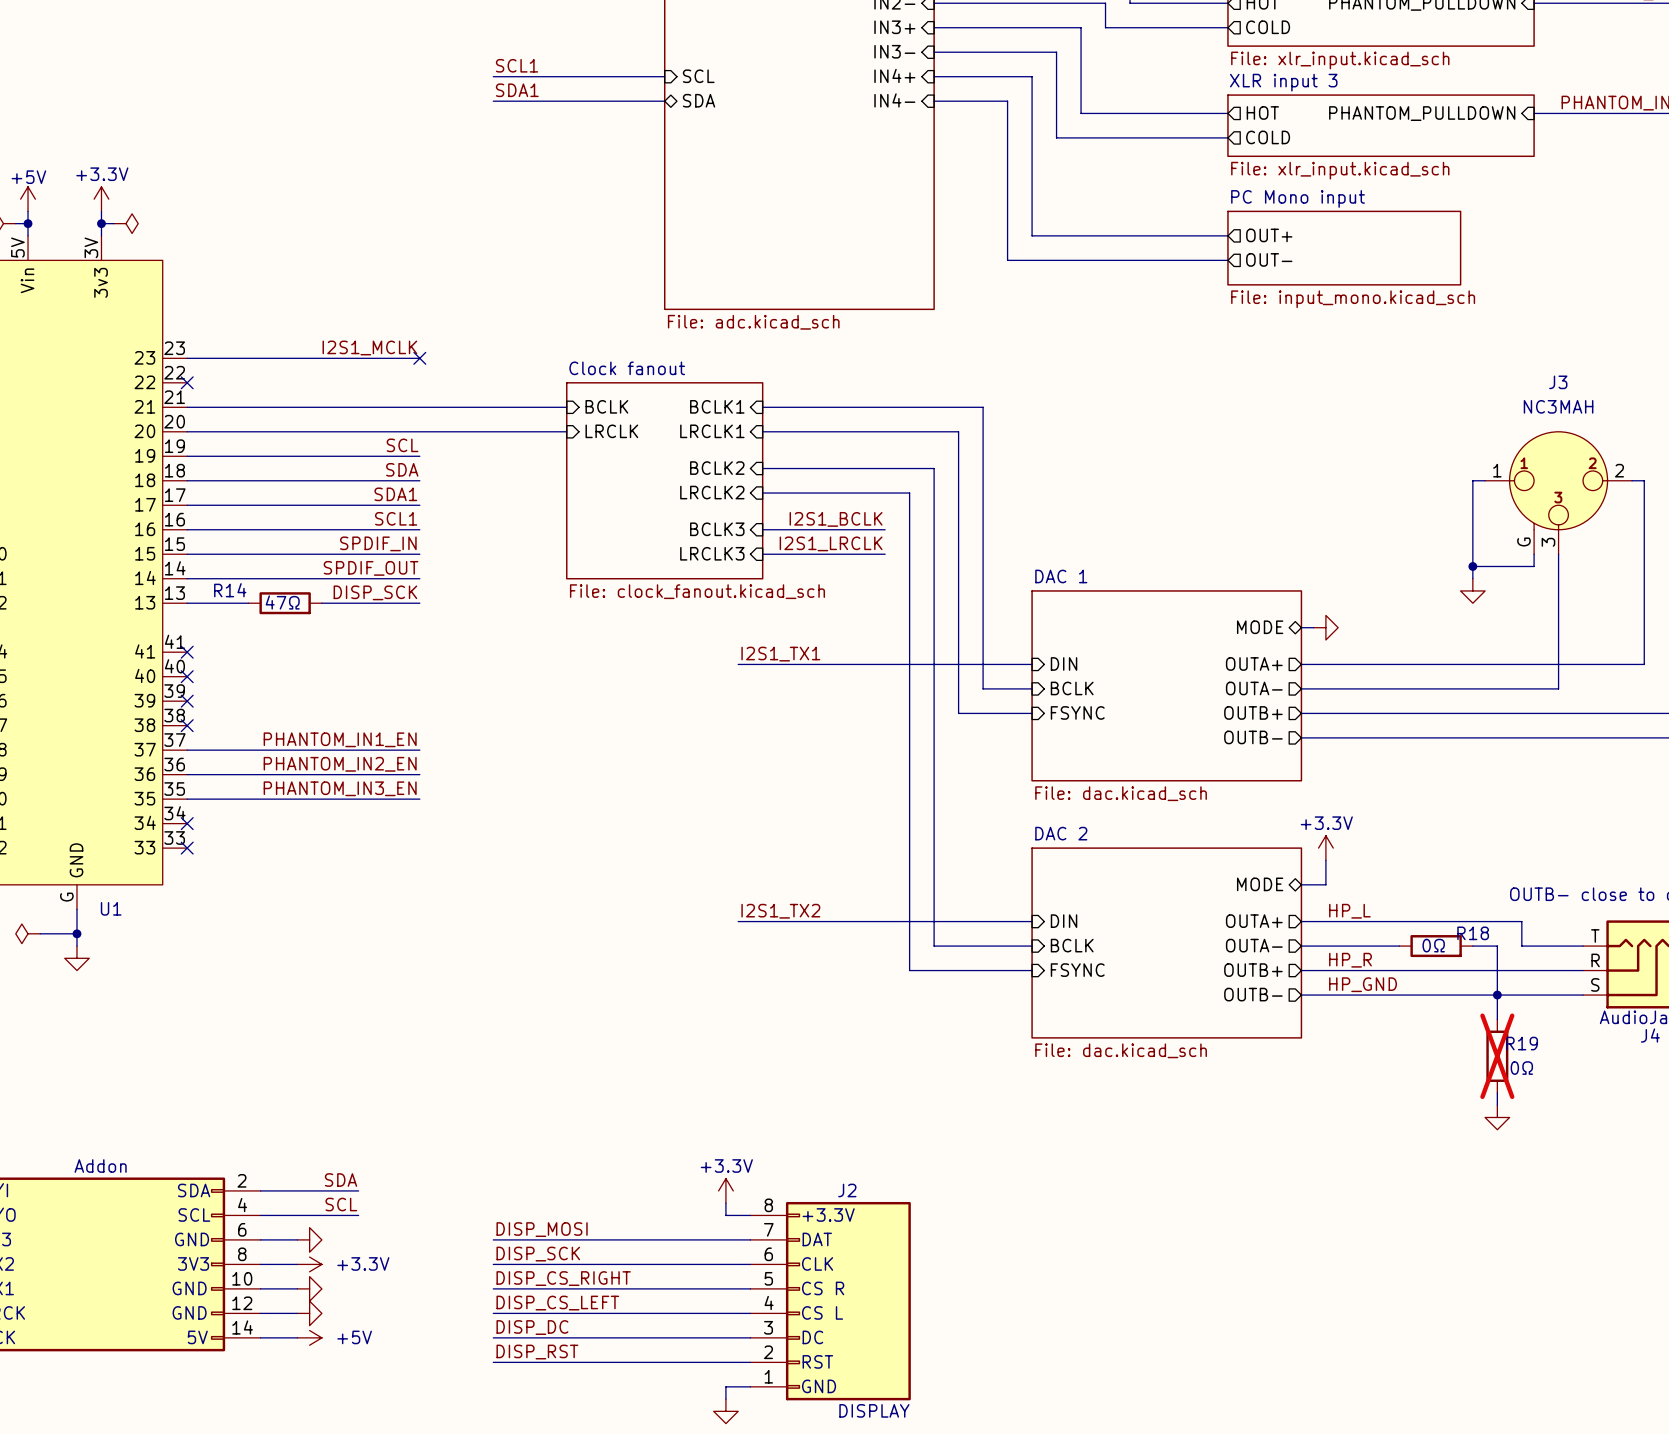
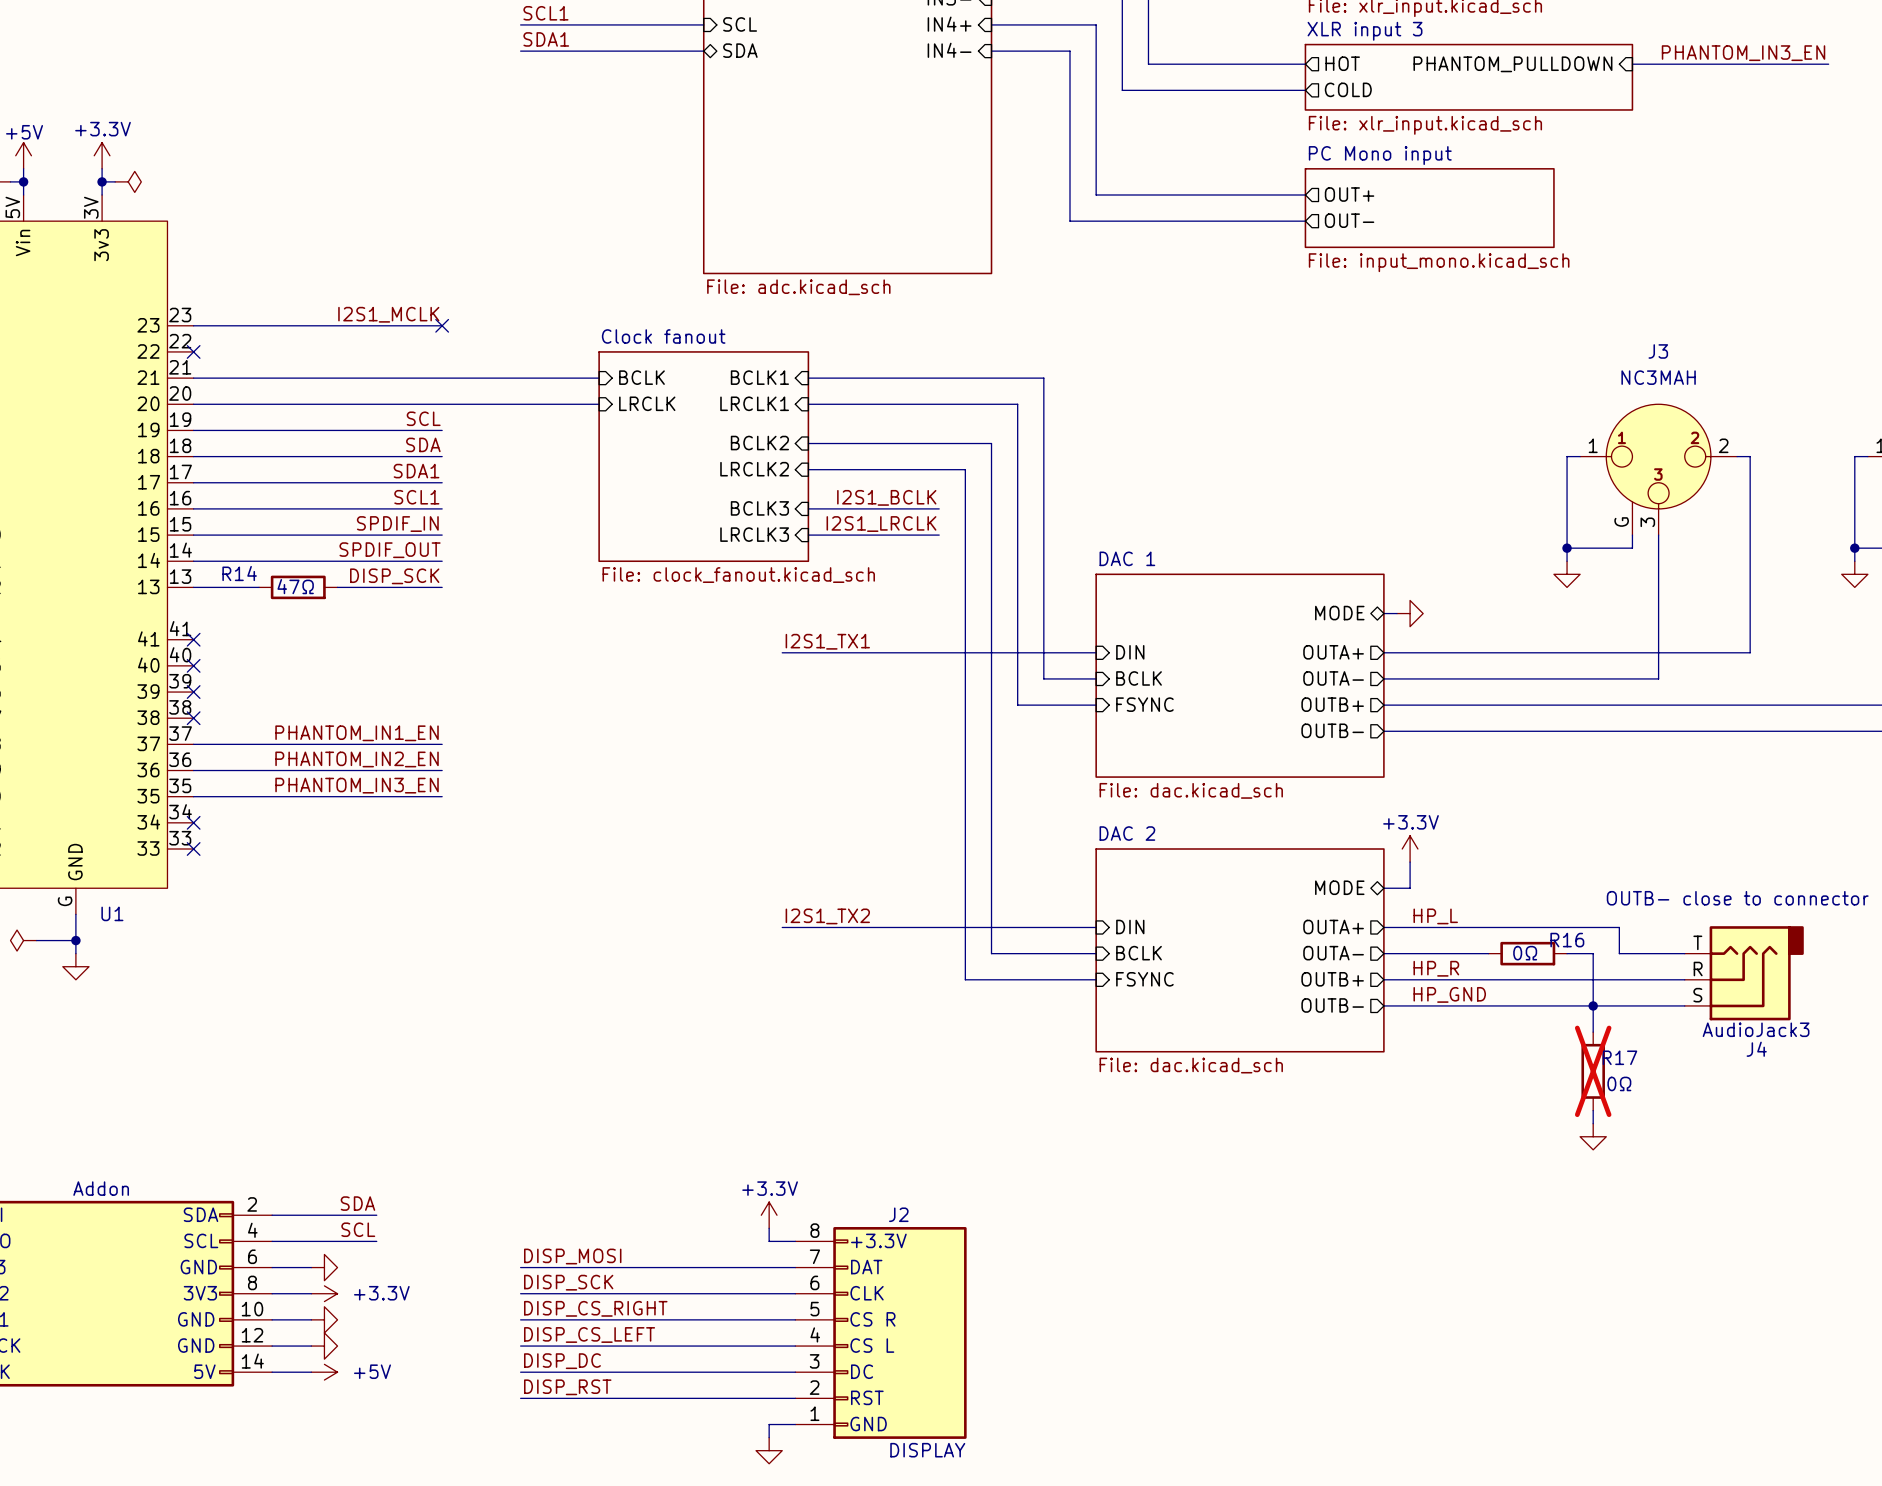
R18 name: R18 (1473, 933) -> R16 (1567, 940)
R19 name: R19 (1522, 1043) -> R17 (1619, 1057)

